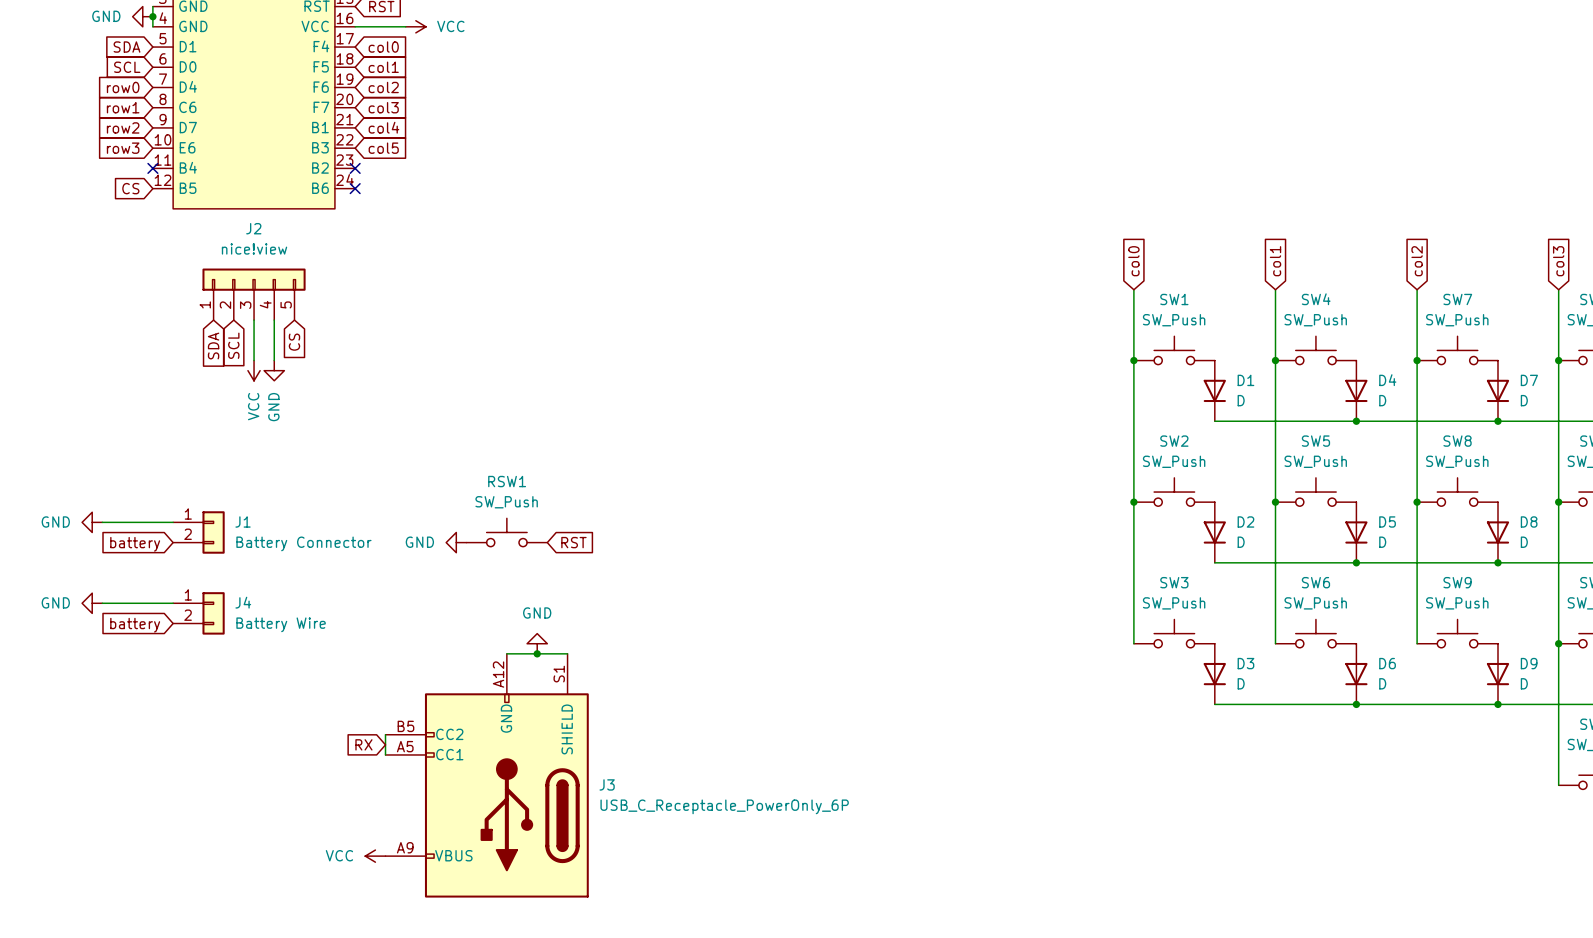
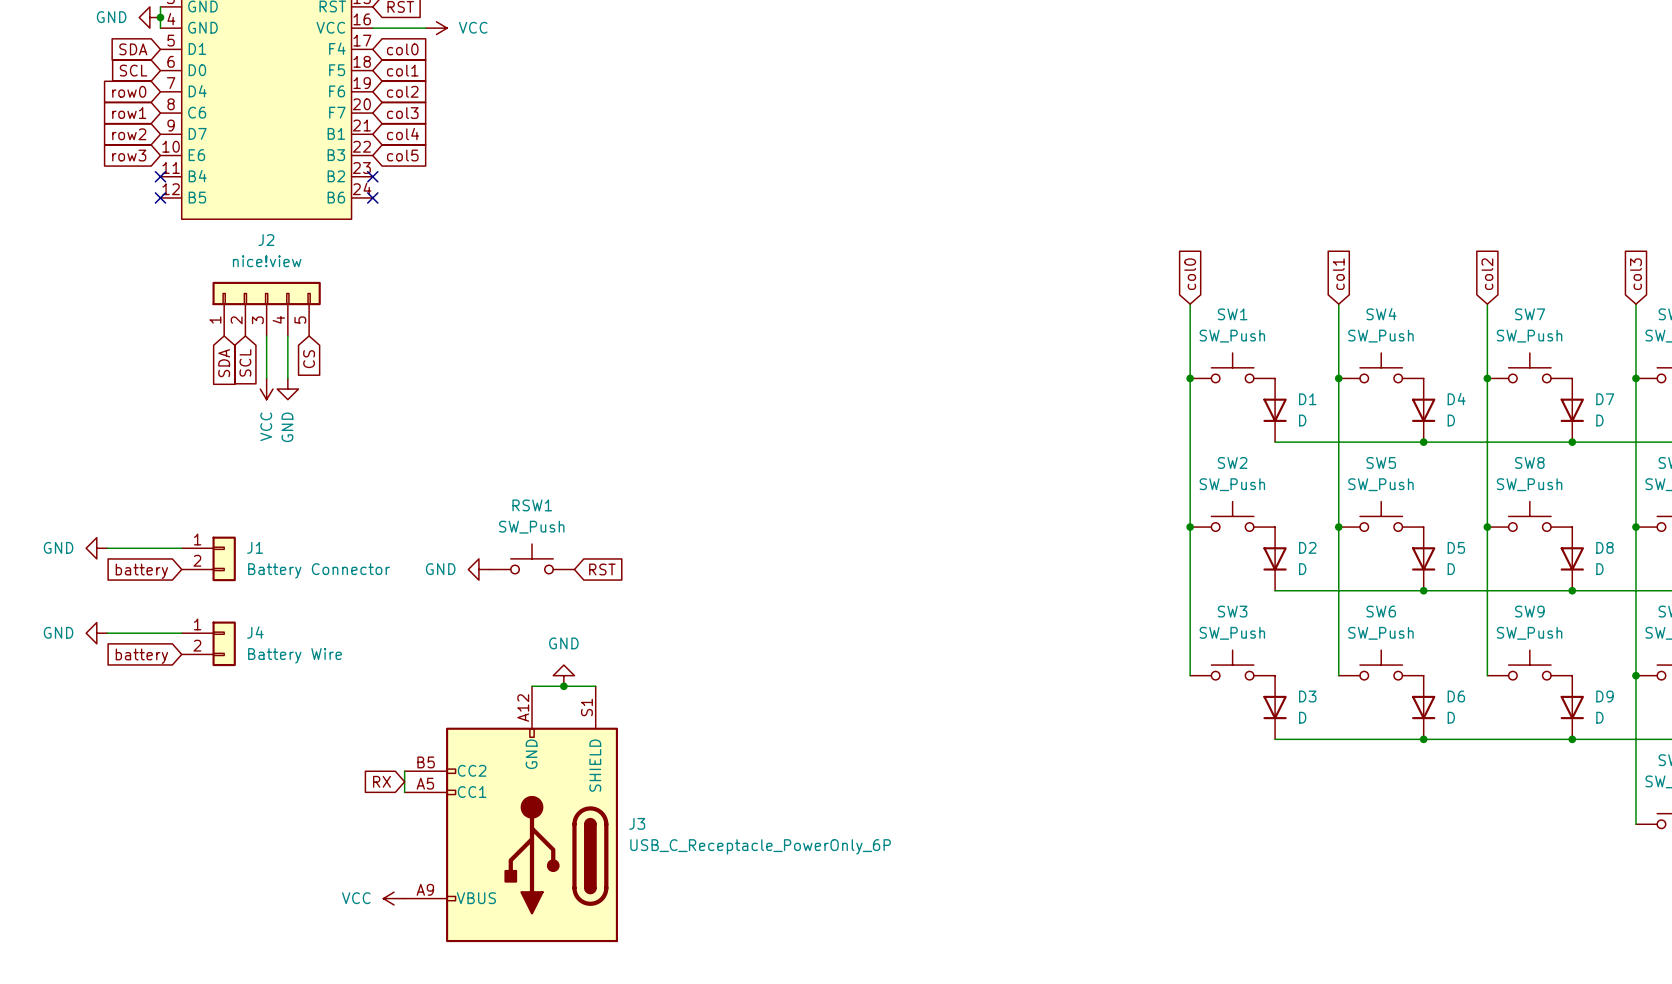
global label: CS (130, 188) -> none
no-connect mark: none -> (160, 197)

